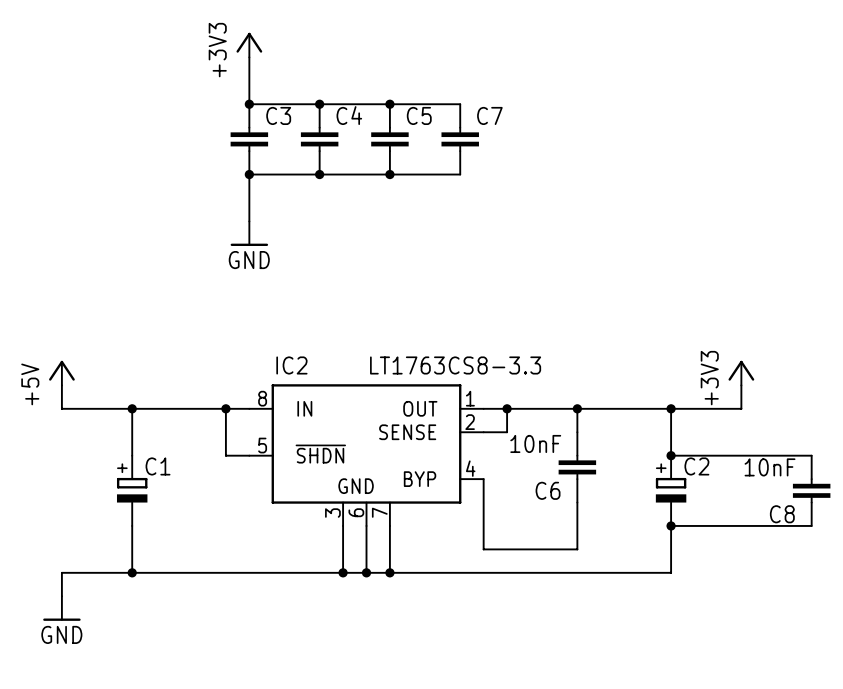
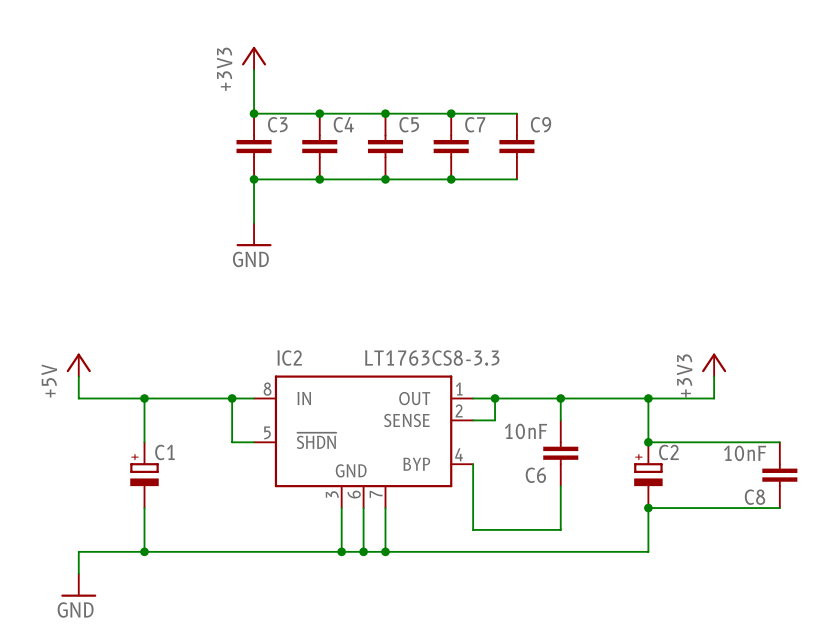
wire: none -> (451, 113) (516, 113)
junction: none -> (451, 113)
C9: none -> (516, 146)
wire: none -> (451, 179) (516, 179)
junction: none -> (451, 179)

